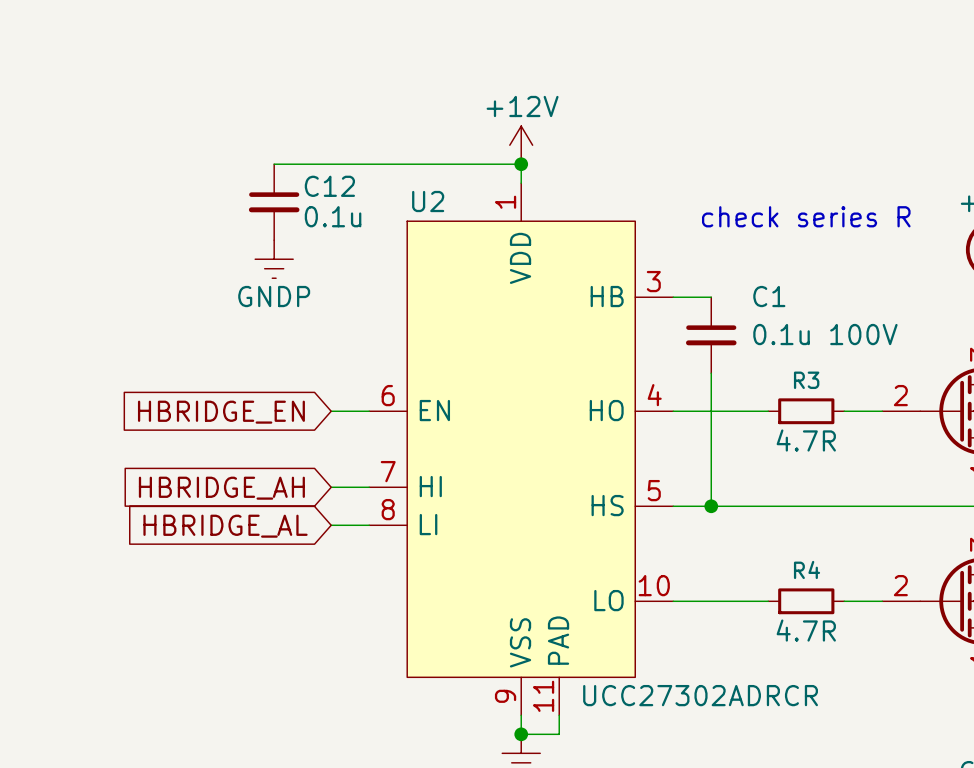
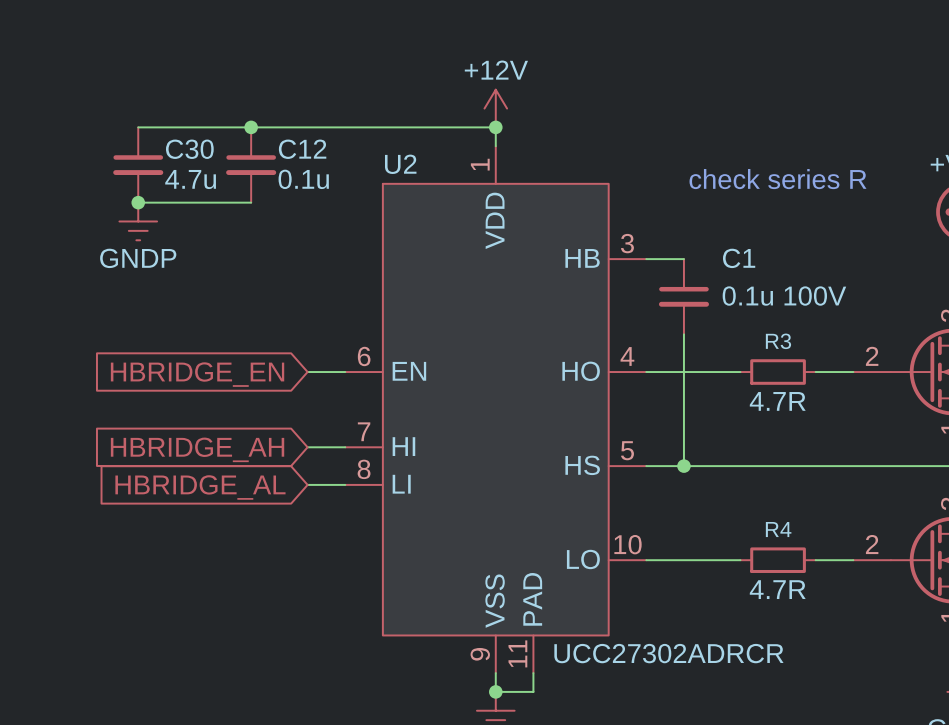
wire: none -> (138, 127) (251, 127)
junction: none -> (251, 127)
C30: none -> 4.7u (138, 165)
wire: none -> (138, 202) (251, 202)
junction: none -> (138, 202)
power symbol position: GNDP (274, 259) -> GNDP (138, 221)

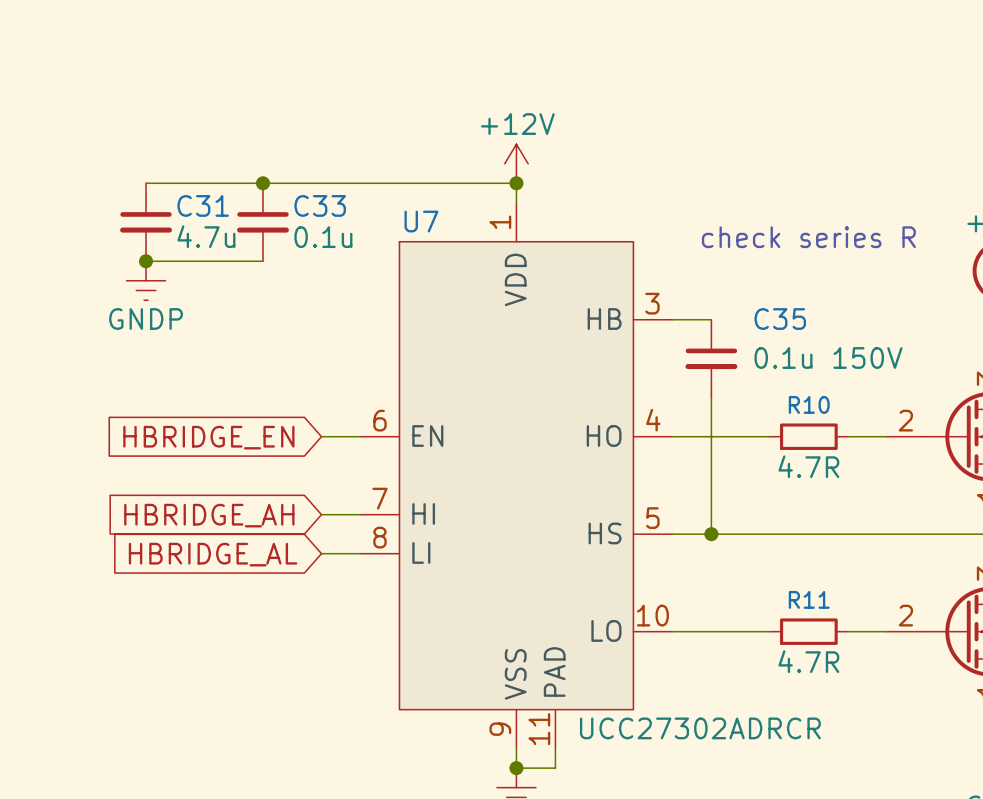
C30 name: C30 (189, 149) -> C31 (203, 205)
C12 name: C12 (302, 149) -> C33 (320, 205)
U2 name: U2 (400, 164) -> U7 (421, 221)
C1 name: C1 (739, 258) -> C35 (780, 319)
C1 value: 0.1u 100V (784, 296) -> 0.1u 150V (828, 358)
R3 name: R3 (778, 341) -> R10 (809, 404)
R4 name: R4 (778, 529) -> R11 (809, 599)

